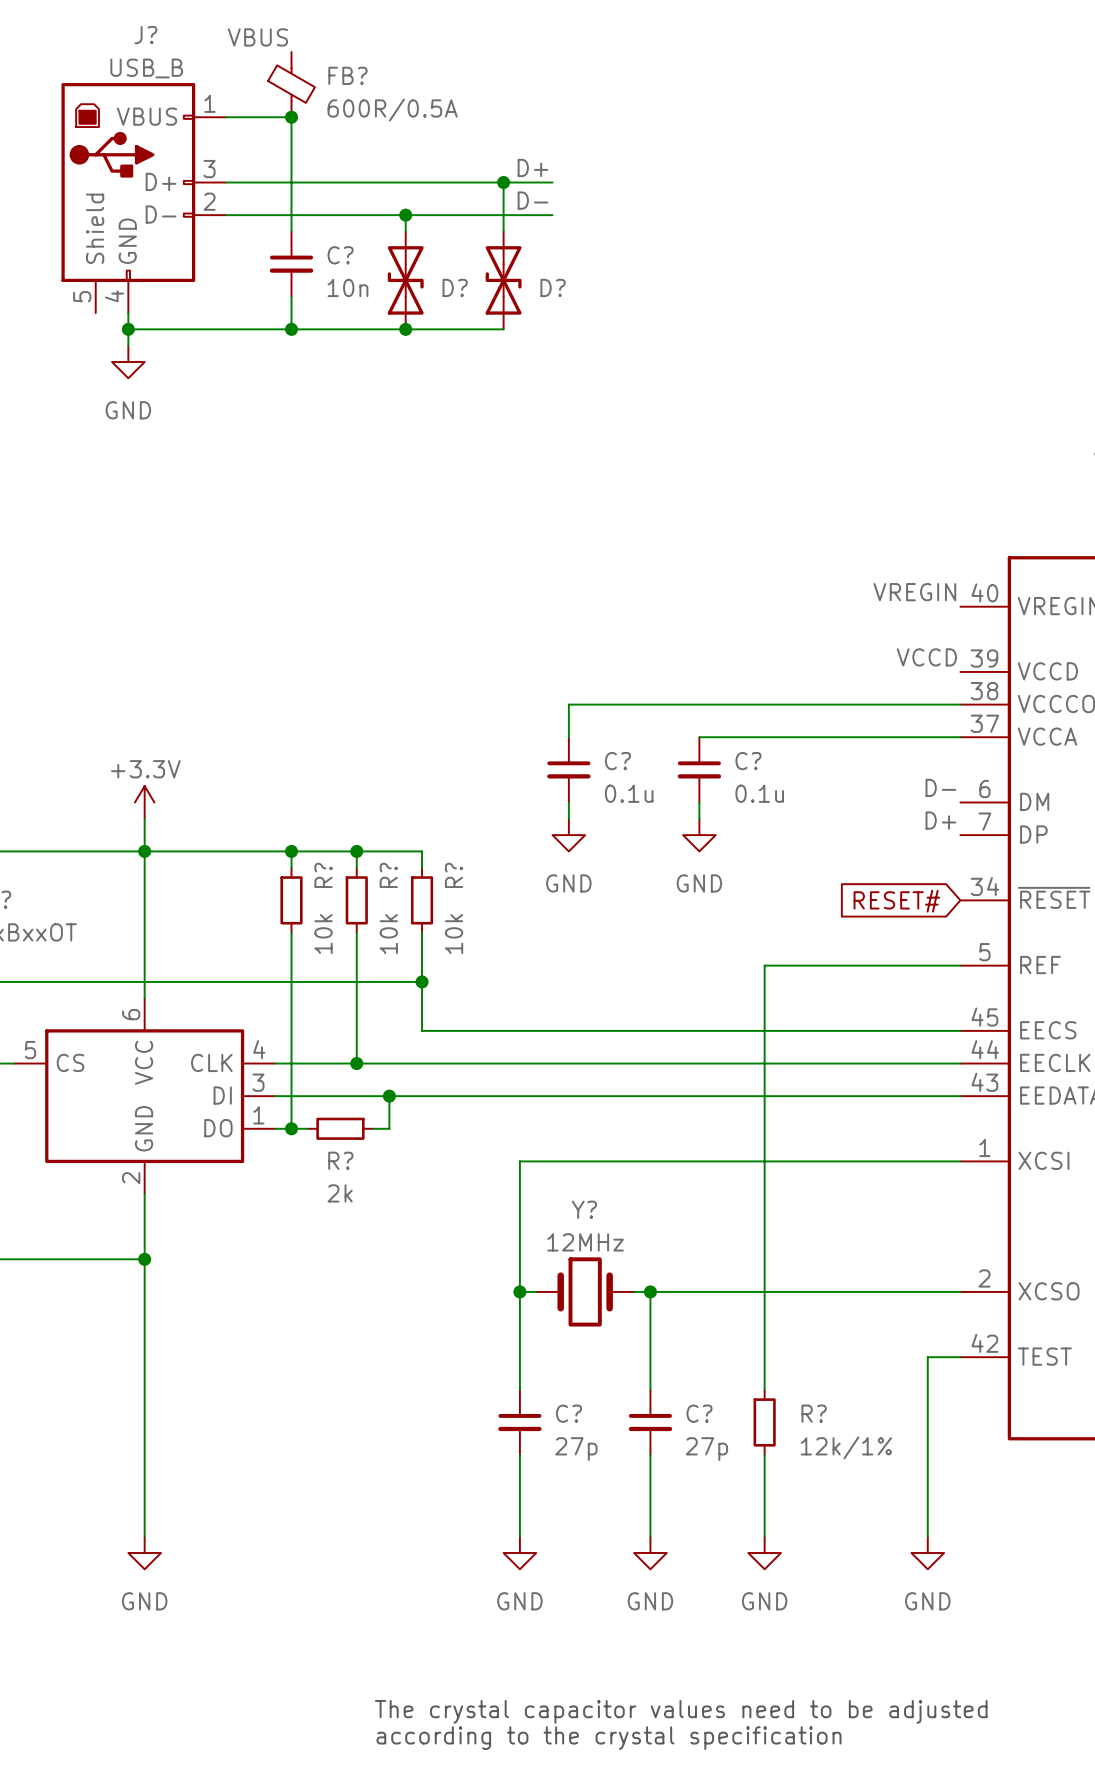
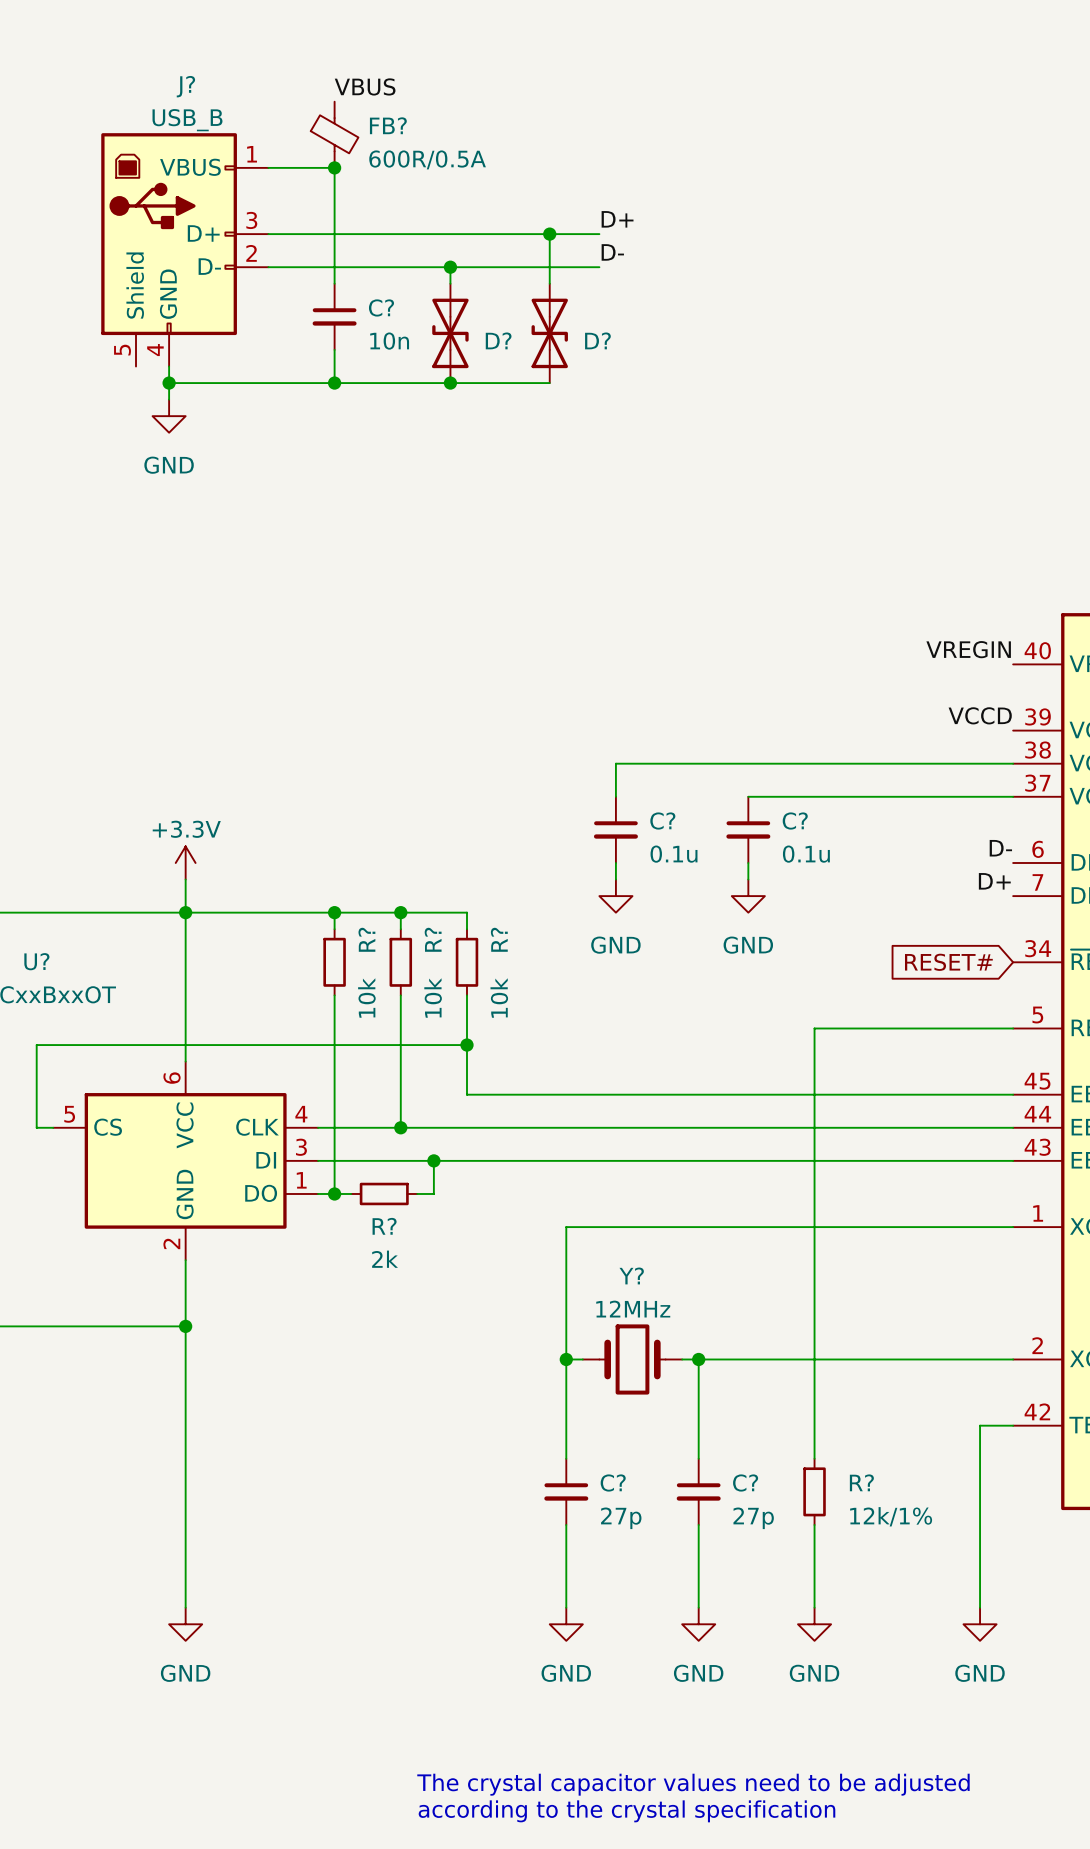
label position: VBUS (257, 37) -> VBUS (365, 86)
label position: D+ (533, 167) -> D+ (617, 219)
label position: D- (533, 200) -> D- (612, 252)

